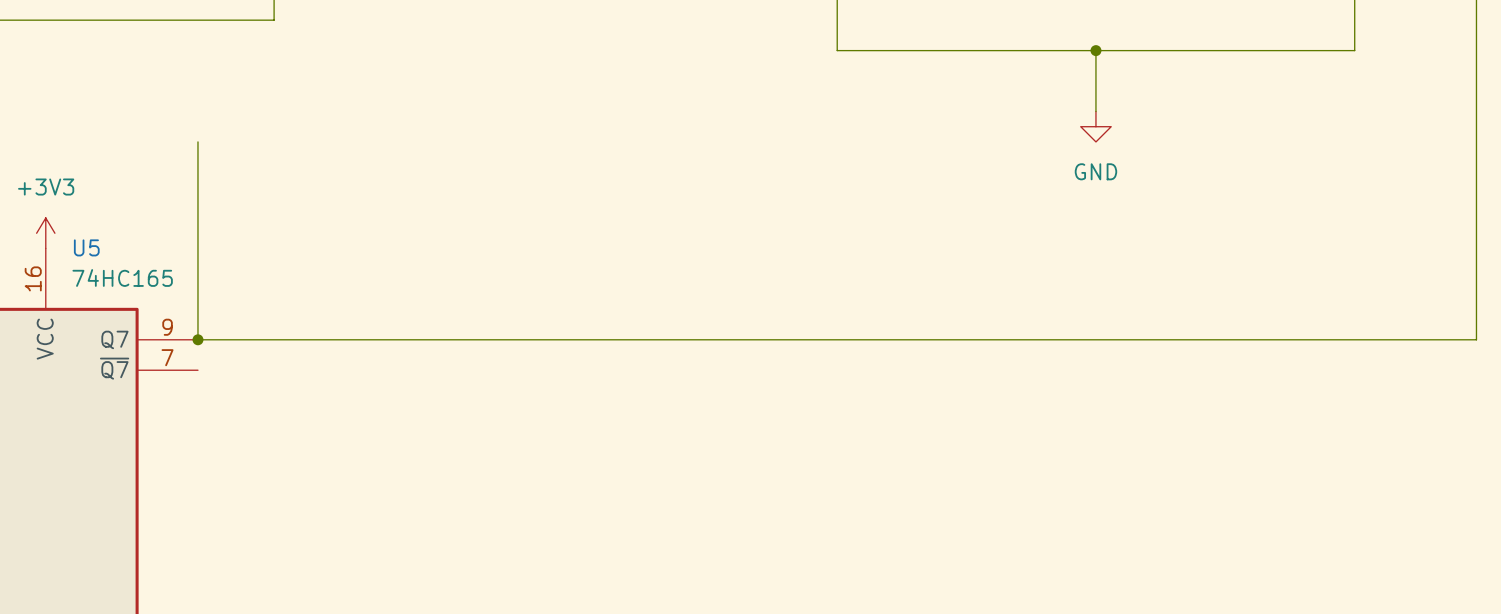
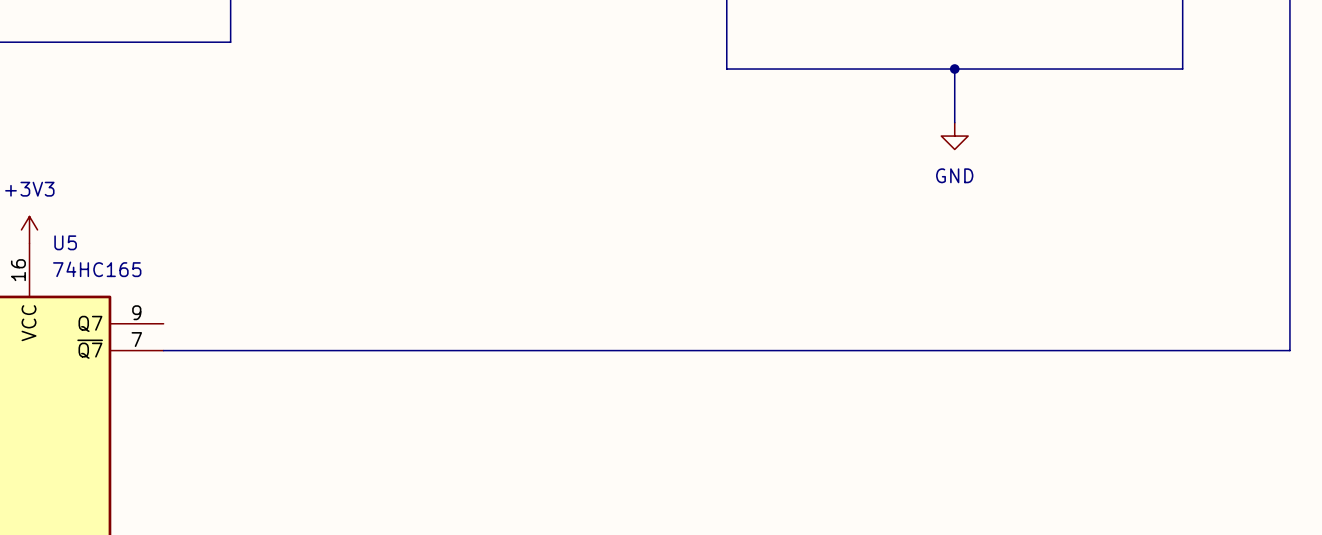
wire: (197, 141) (197, 339) (1476, 339) -> (163, 350) (1289, 350) (1289, 323)
junction: (197, 339) -> none

